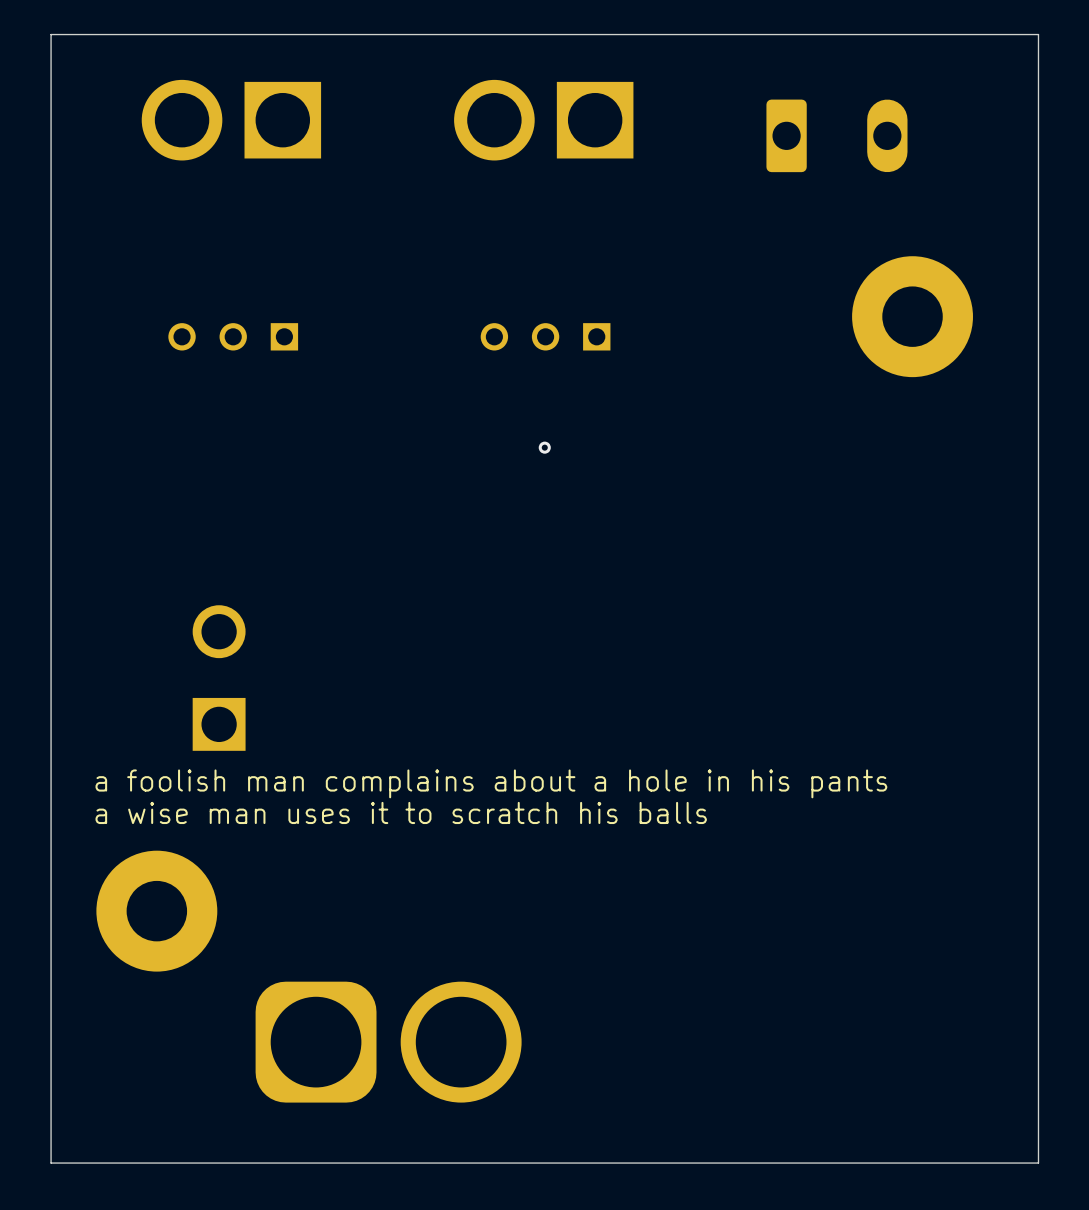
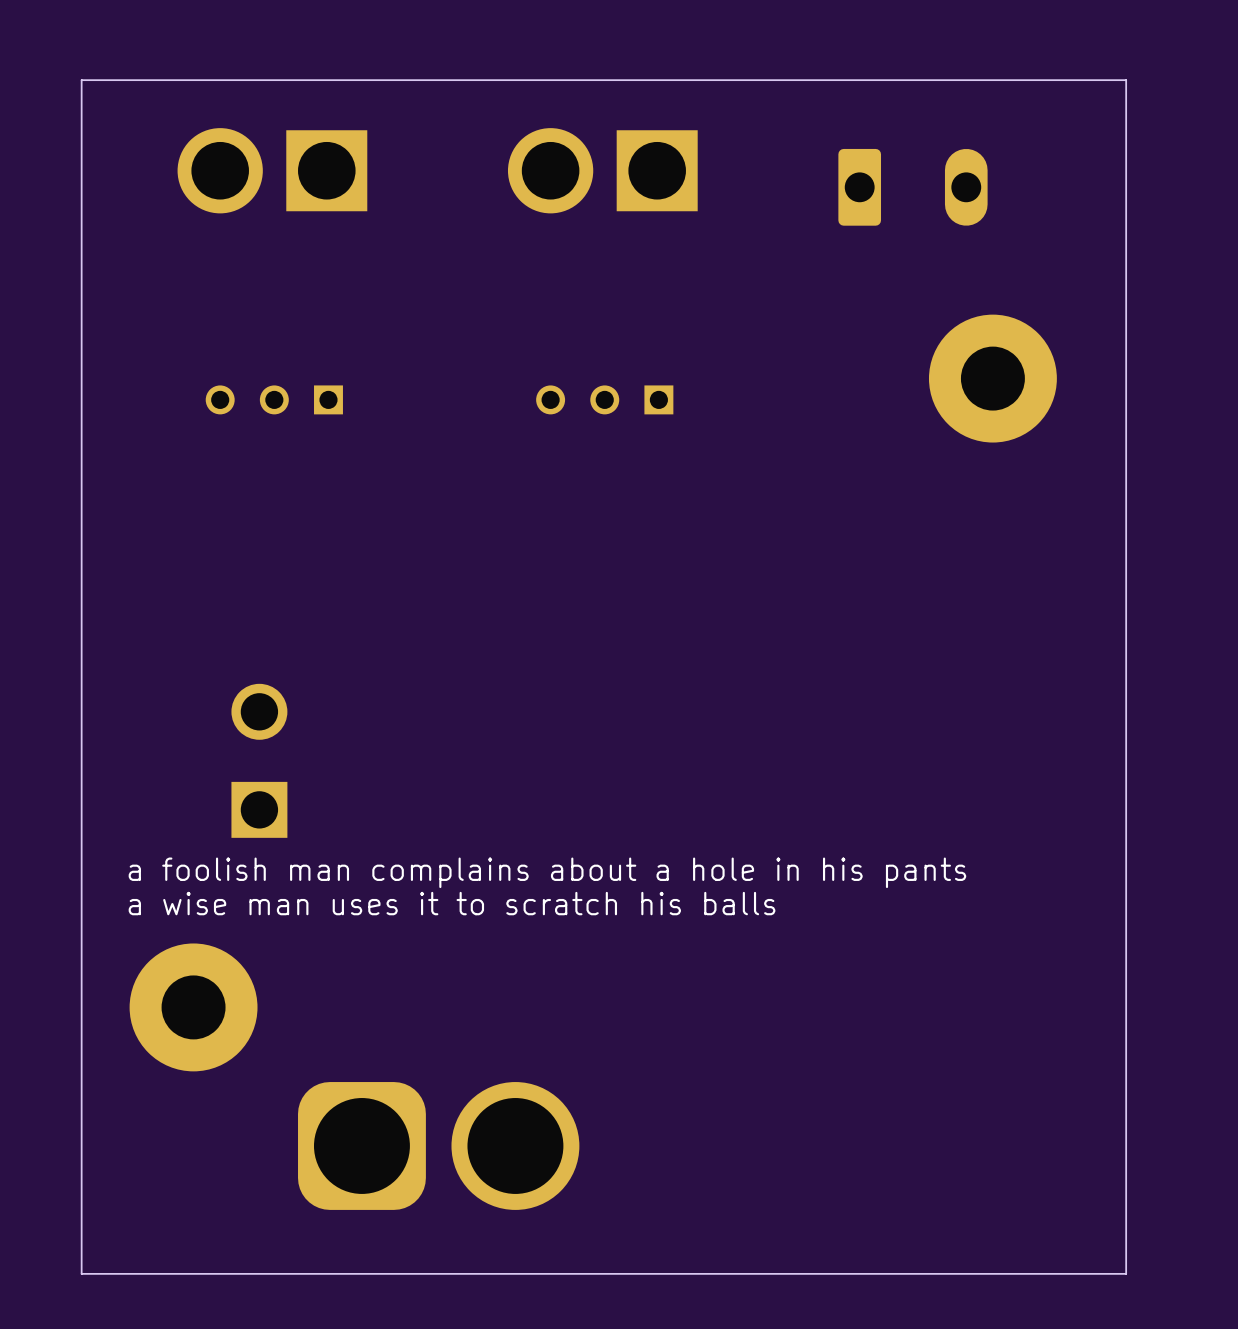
via: (544, 447) -> none

